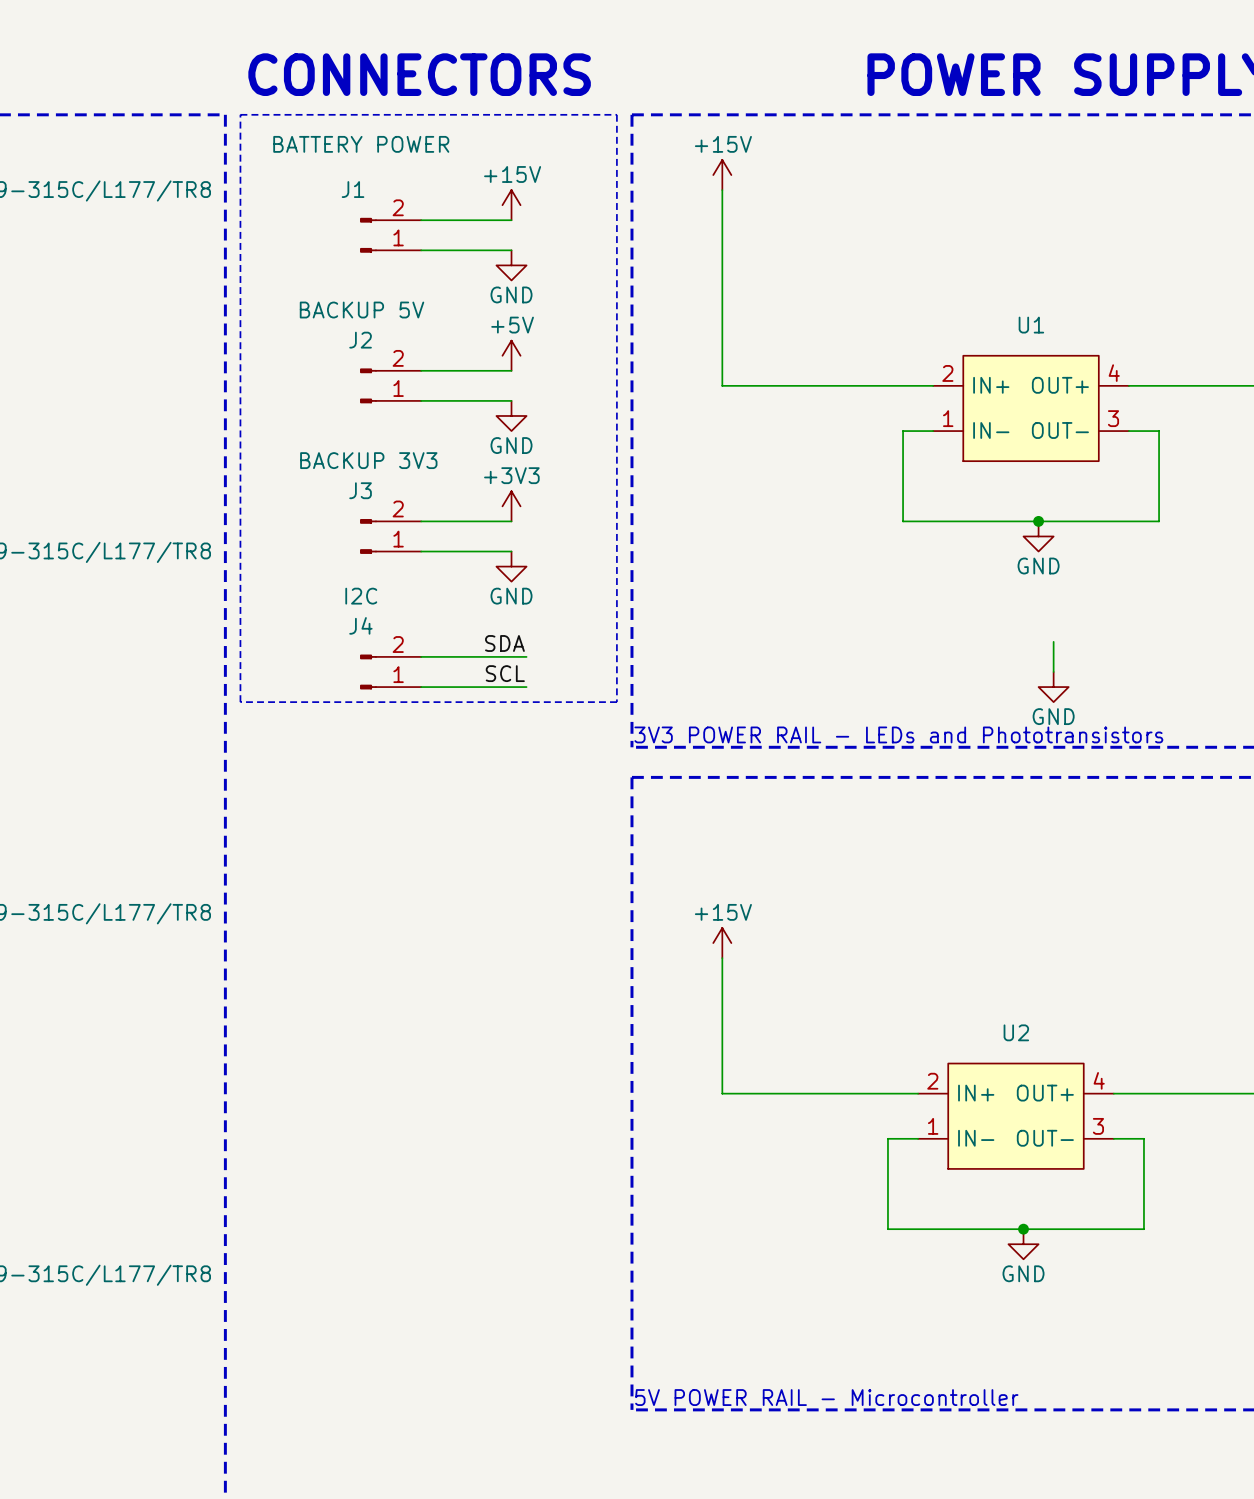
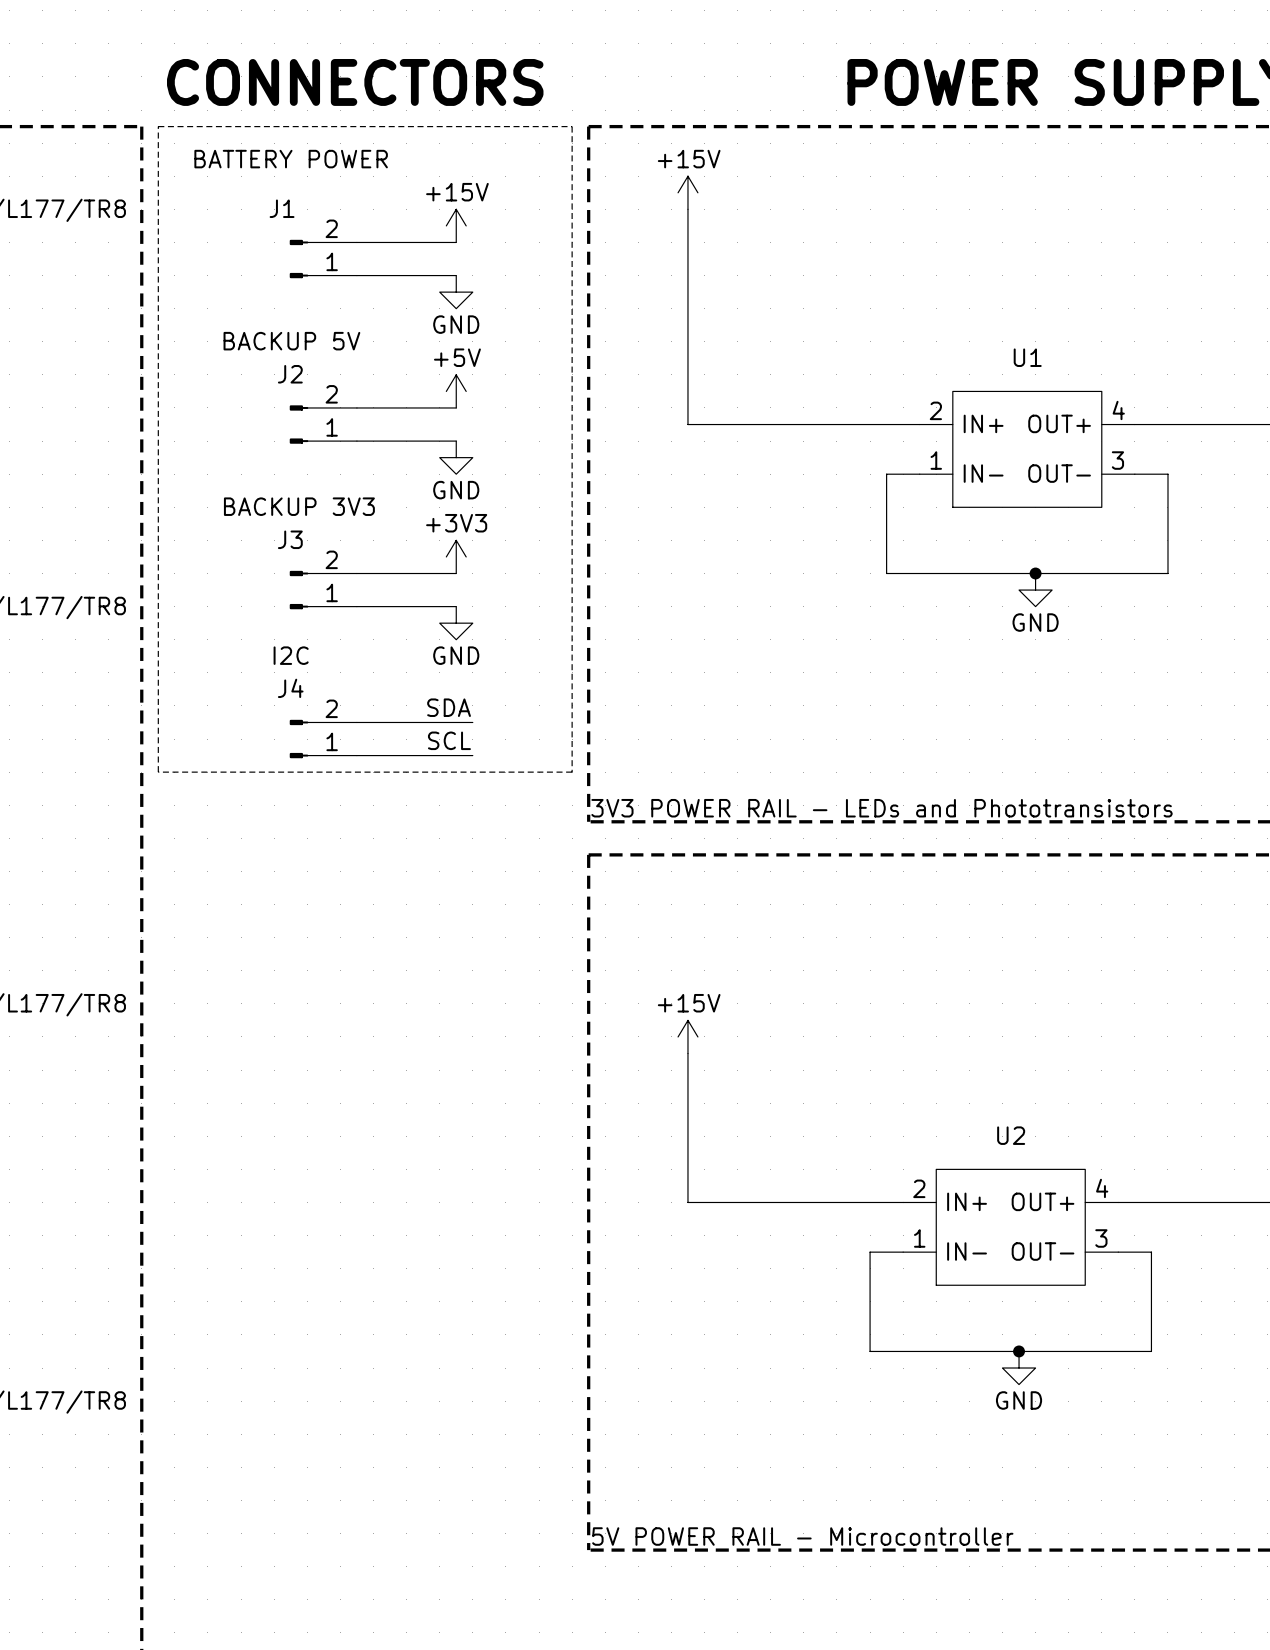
wire: (1053, 641) (1053, 671) -> none
power symbol: GND (1053, 687) -> none

